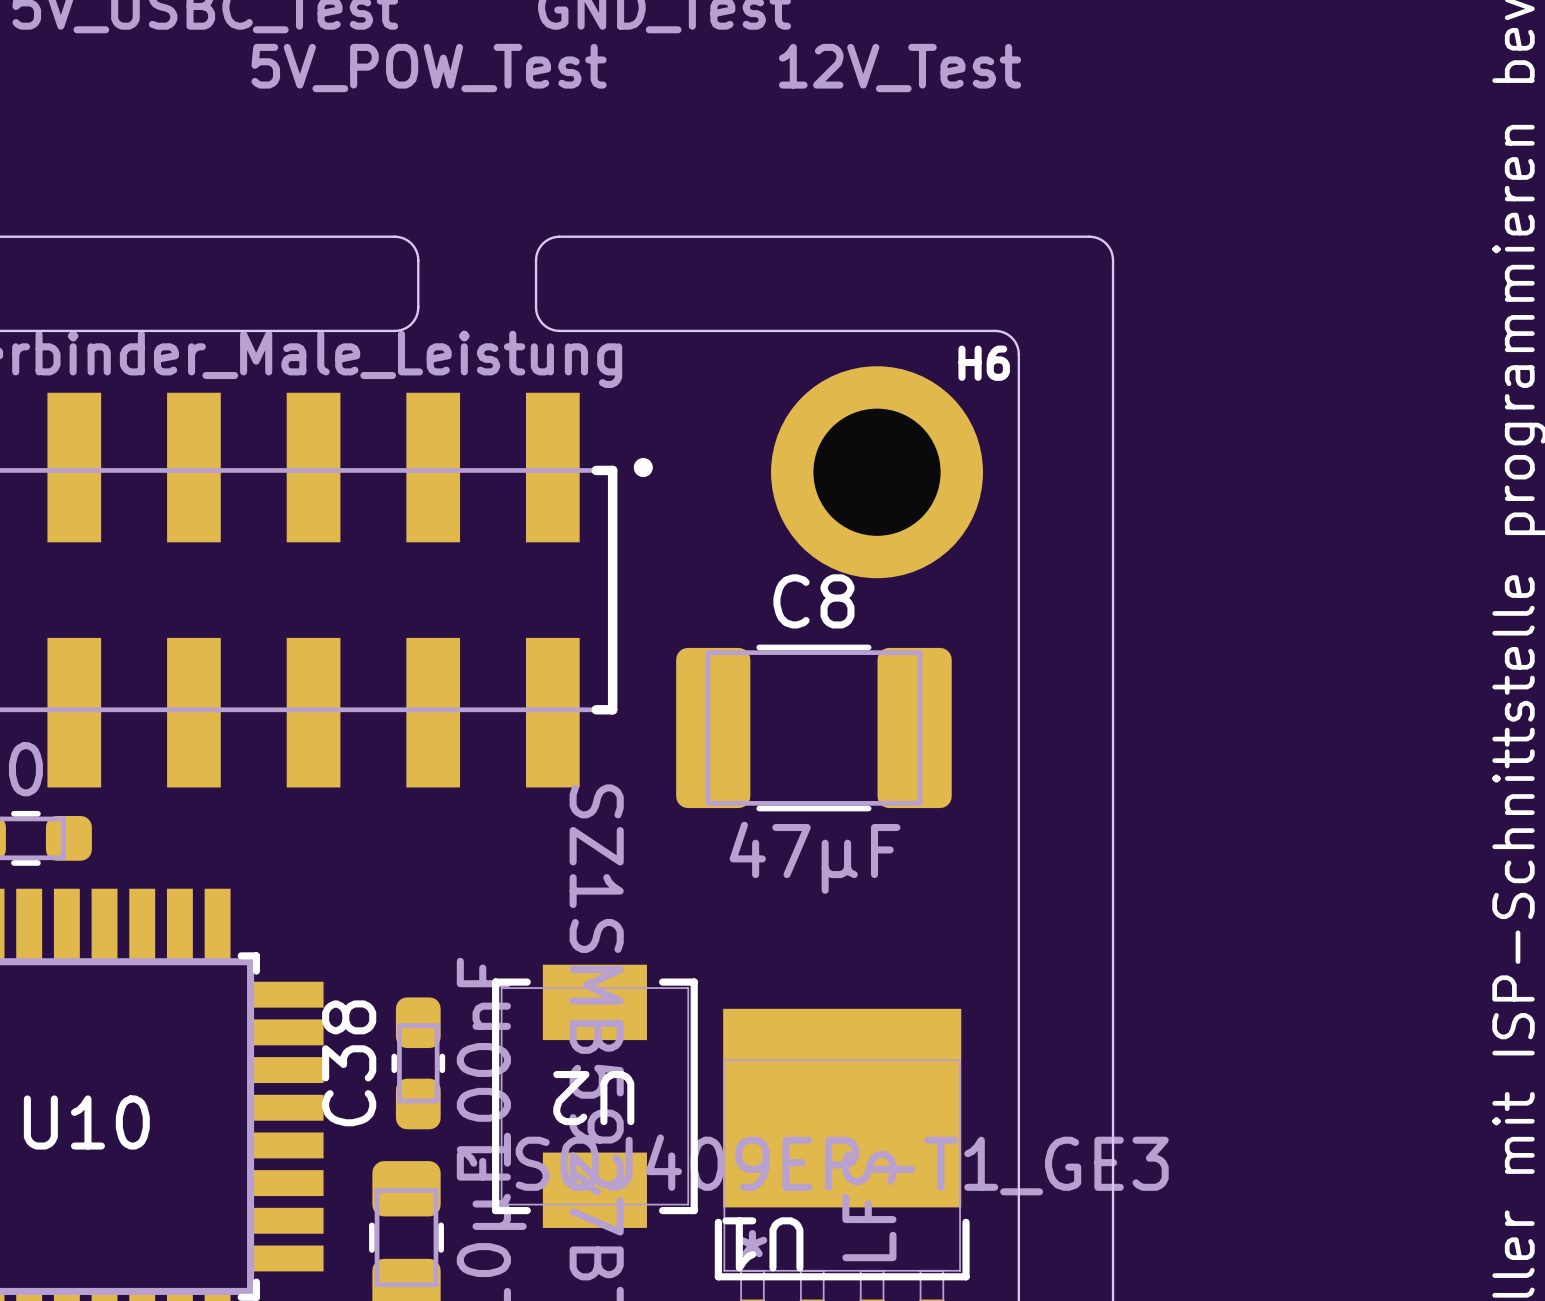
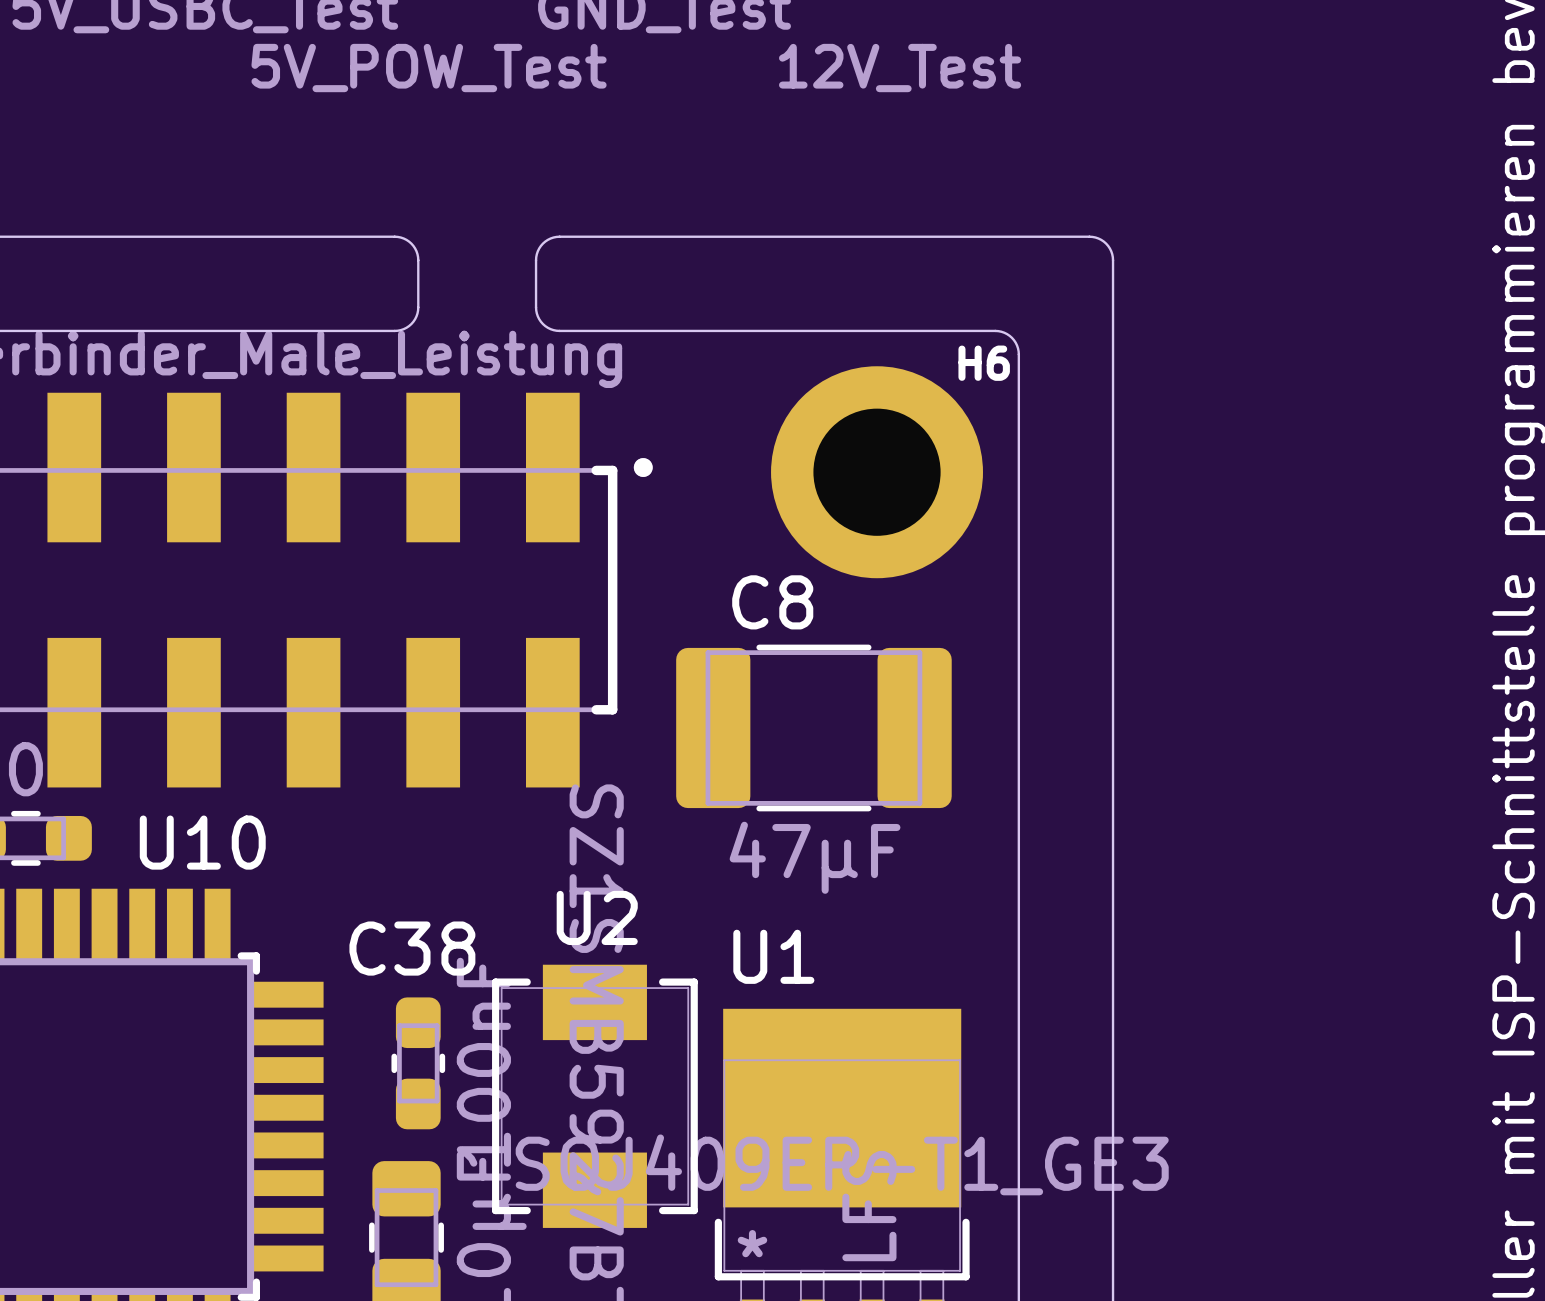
C8 name position: C8 (813, 601) -> C8 (772, 602)
C38 name rotation: 0° (349, 1063) -> 90° clockwise (412, 948)
U2 name rotation: 0° (593, 1098) -> 180° (597, 917)
U2 name position: U2 (593, 1098) -> U2 (597, 917)
U10 name position: U10 (86, 1122) -> U10 (202, 842)
U1 name rotation: 0° (762, 1244) -> 180° (773, 956)
U1 name position: U1 (762, 1244) -> U1 (773, 956)

